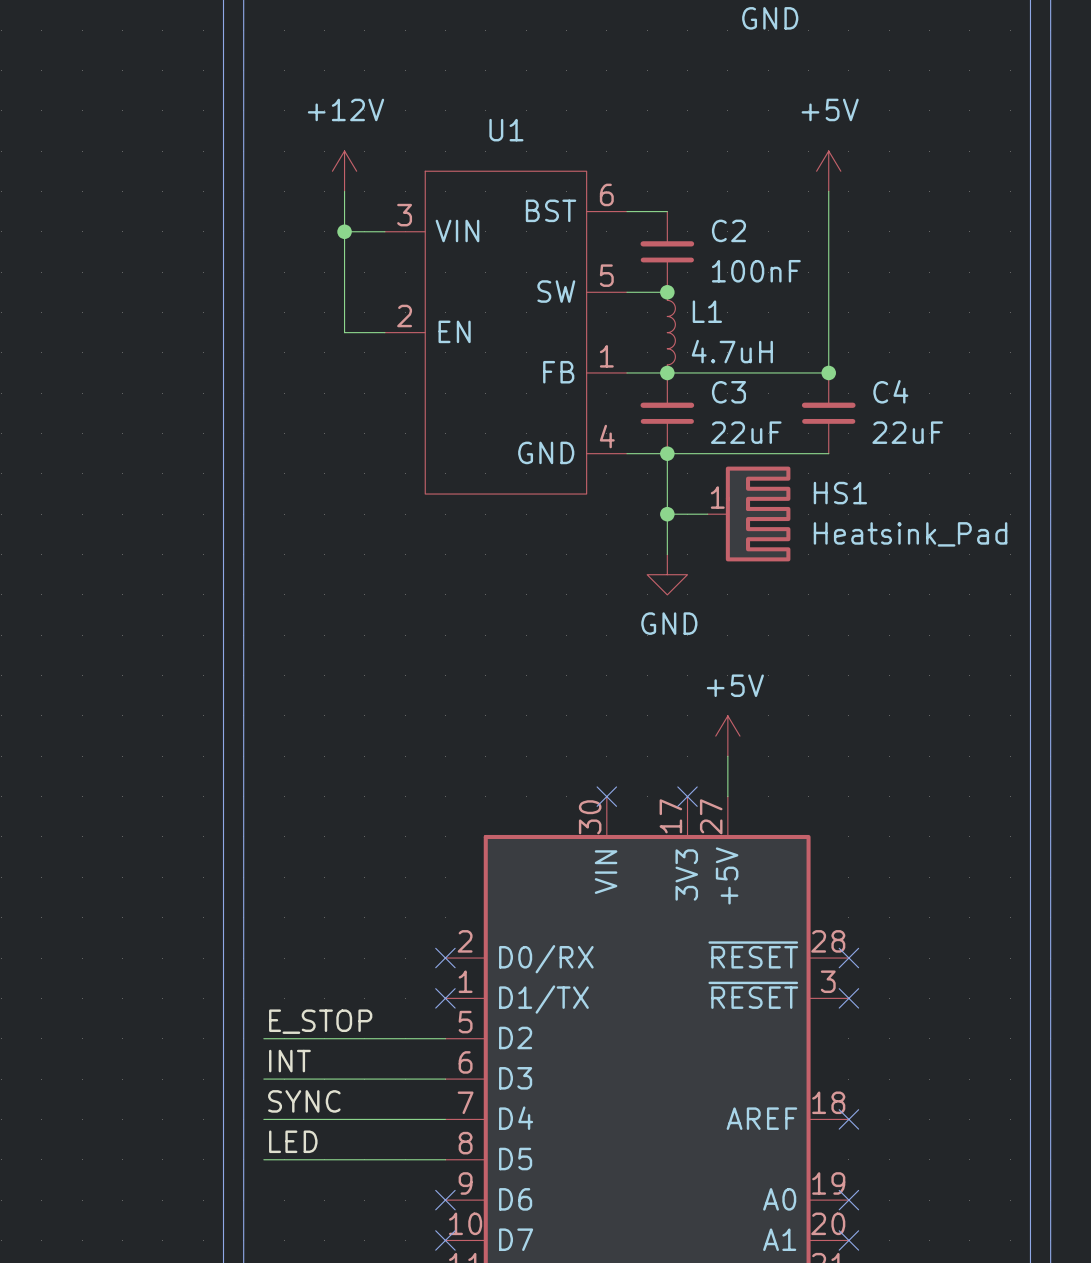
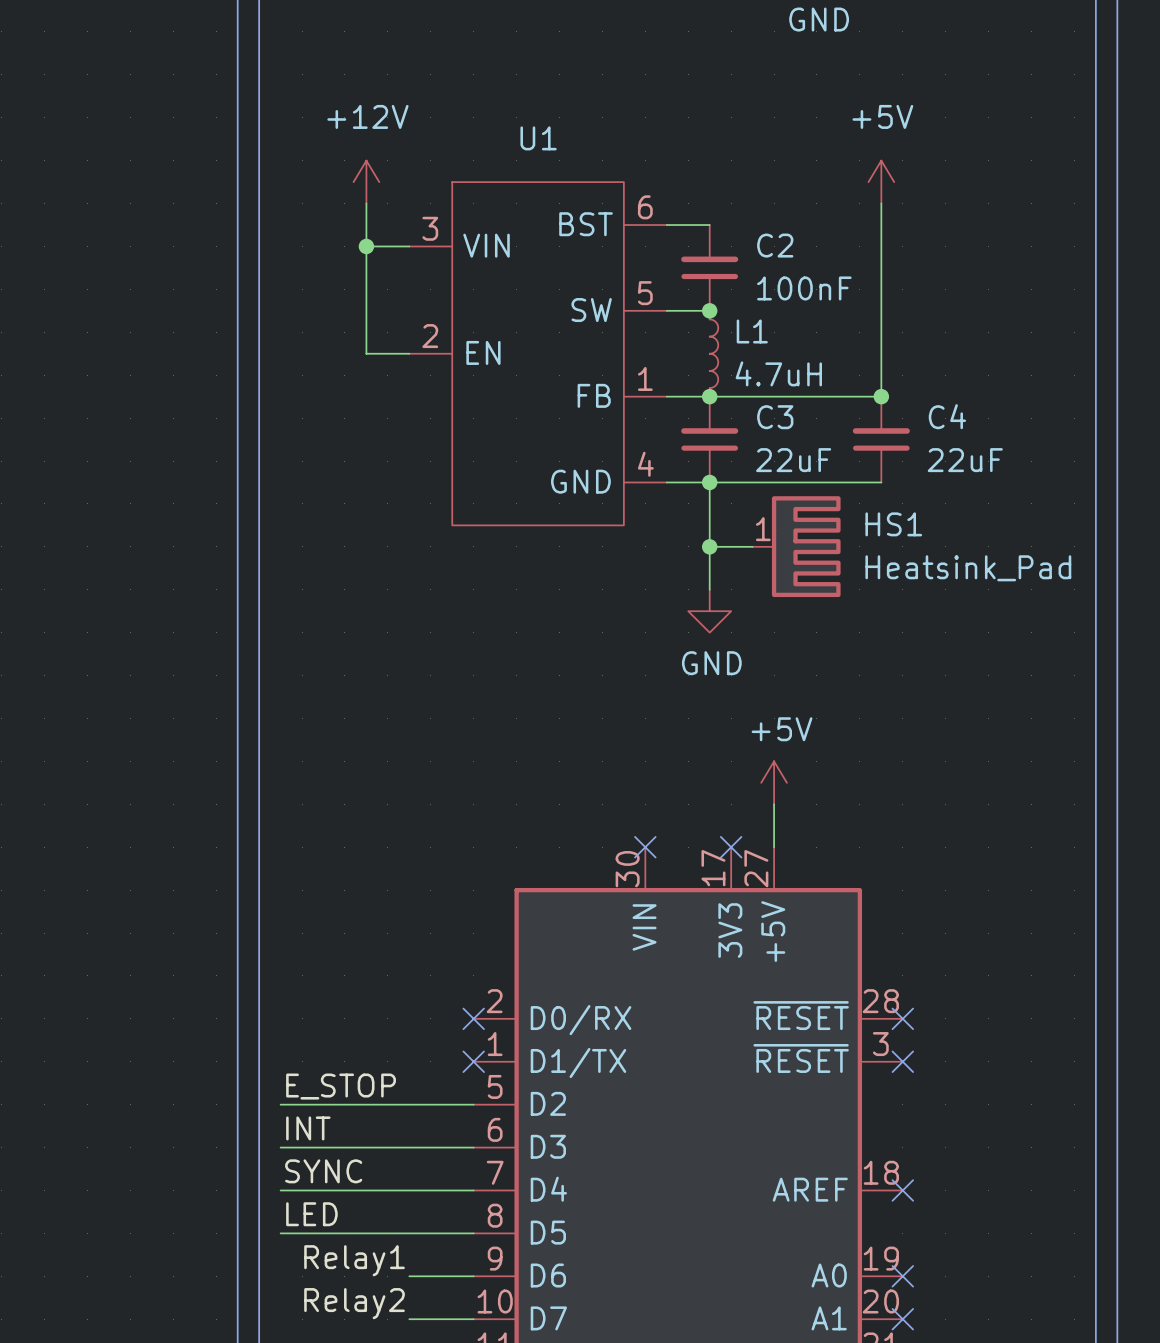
label: none -> Relay1 (354, 1260)
wire: none -> (409, 1276) (473, 1276)
no-connect mark: (445, 1200) -> none
label: none -> Relay2 (354, 1303)
wire: none -> (409, 1319) (473, 1319)
no-connect mark: (445, 1240) -> none

